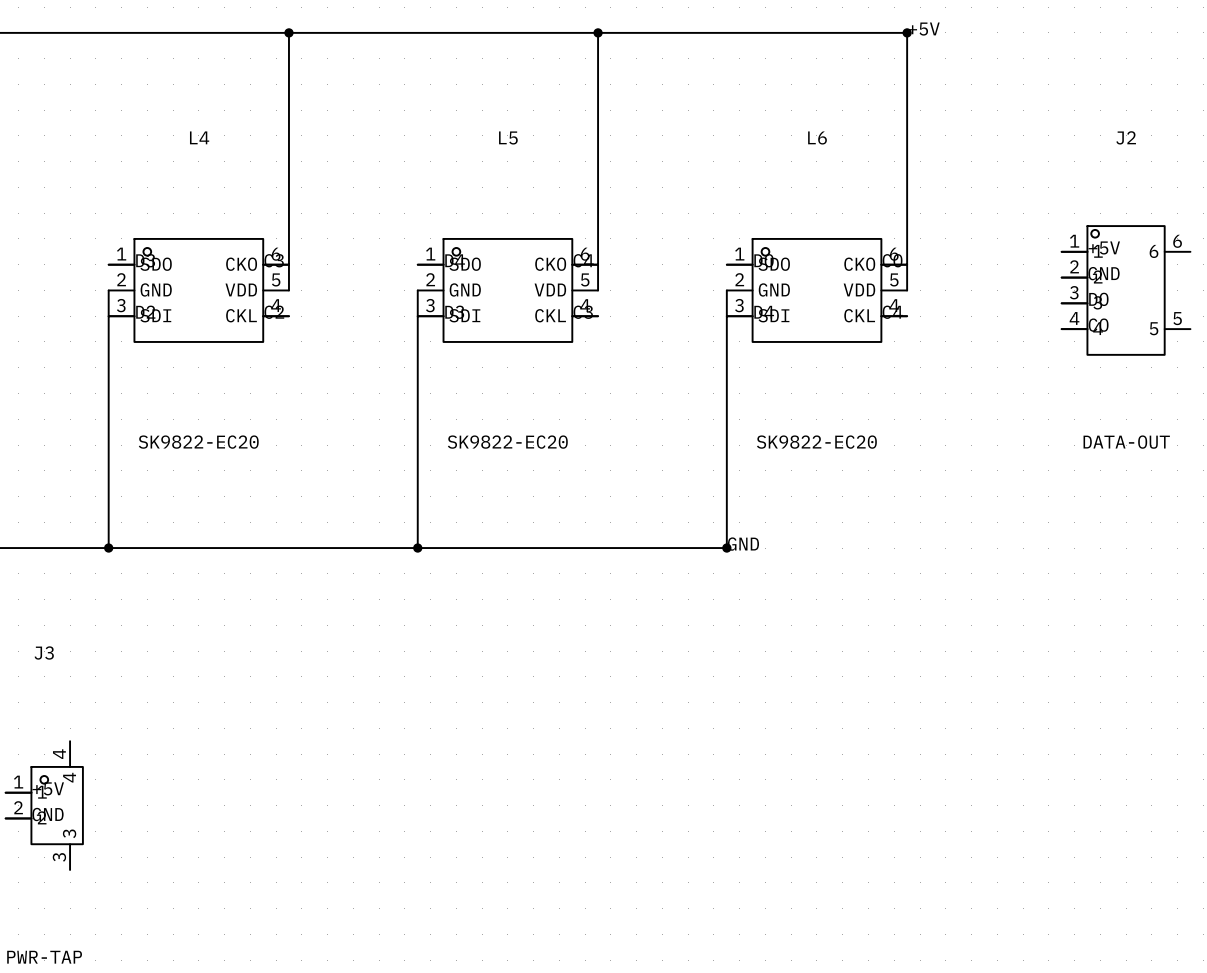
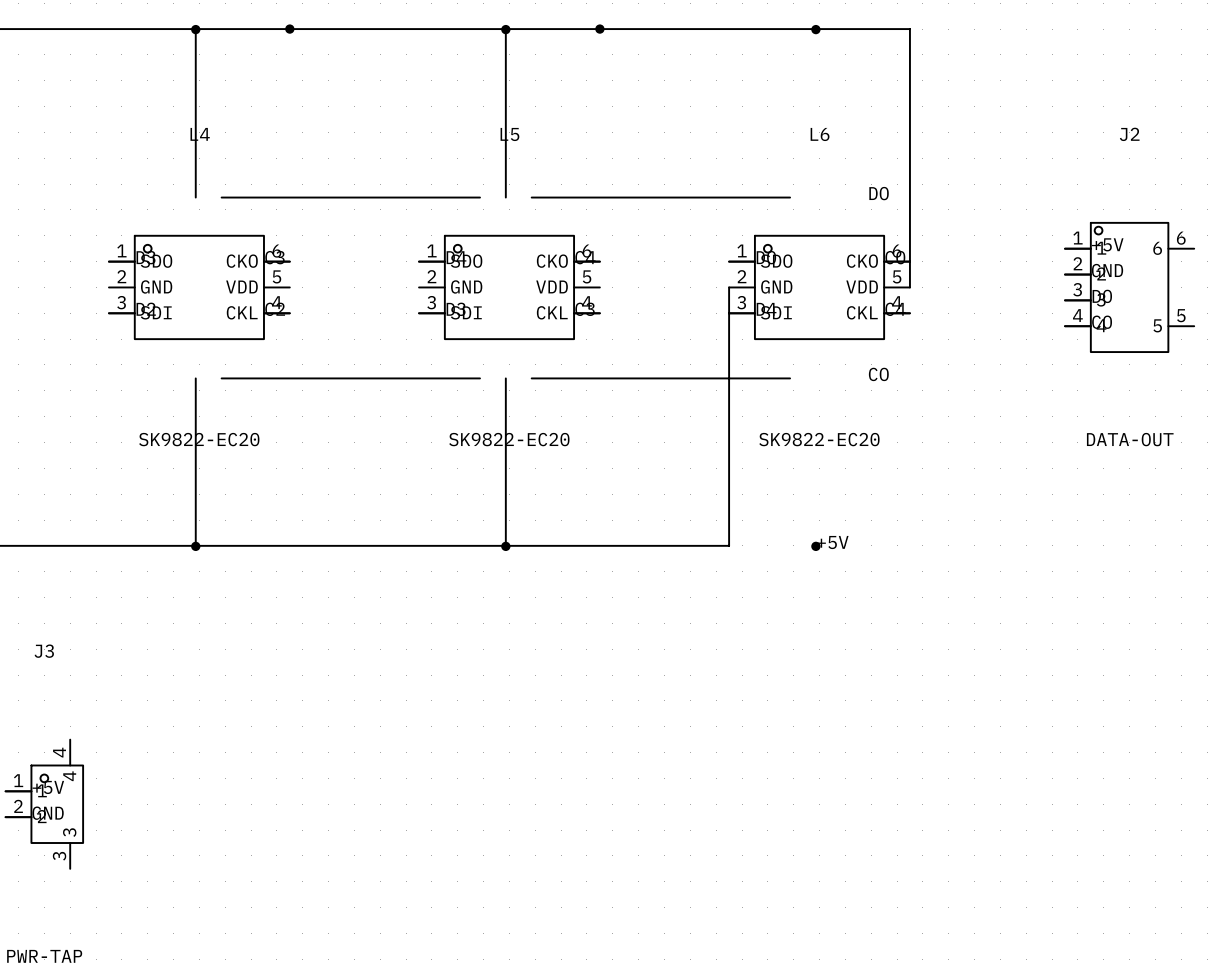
label: +5V (923, 29) -> none
wire: (288, 32) (288, 290) -> none
wire: (598, 32) (598, 290) -> none
junction: (907, 32) -> none
wire: none -> (195, 29) (195, 197)
junction: none -> (195, 29)
wire: none -> (505, 29) (505, 197)
junction: none -> (505, 29)
junction: none -> (815, 29)
label: none -> DO (879, 193)
wire: none -> (221, 197) (480, 197)
wire: none -> (531, 197) (790, 197)
wire: (108, 290) (108, 548) -> none
wire: (417, 290) (417, 548) -> none
label: none -> CO (878, 374)
wire: none -> (195, 378) (195, 546)
wire: none -> (221, 378) (480, 378)
wire: none -> (505, 378) (505, 546)
wire: none -> (531, 378) (790, 378)
label: GND (743, 544) -> none
label: none -> +5V (832, 542)
junction: (108, 548) -> none
junction: none -> (195, 546)
junction: (417, 548) -> none
junction: none -> (505, 546)
junction: (726, 548) -> none
junction: none -> (815, 546)

